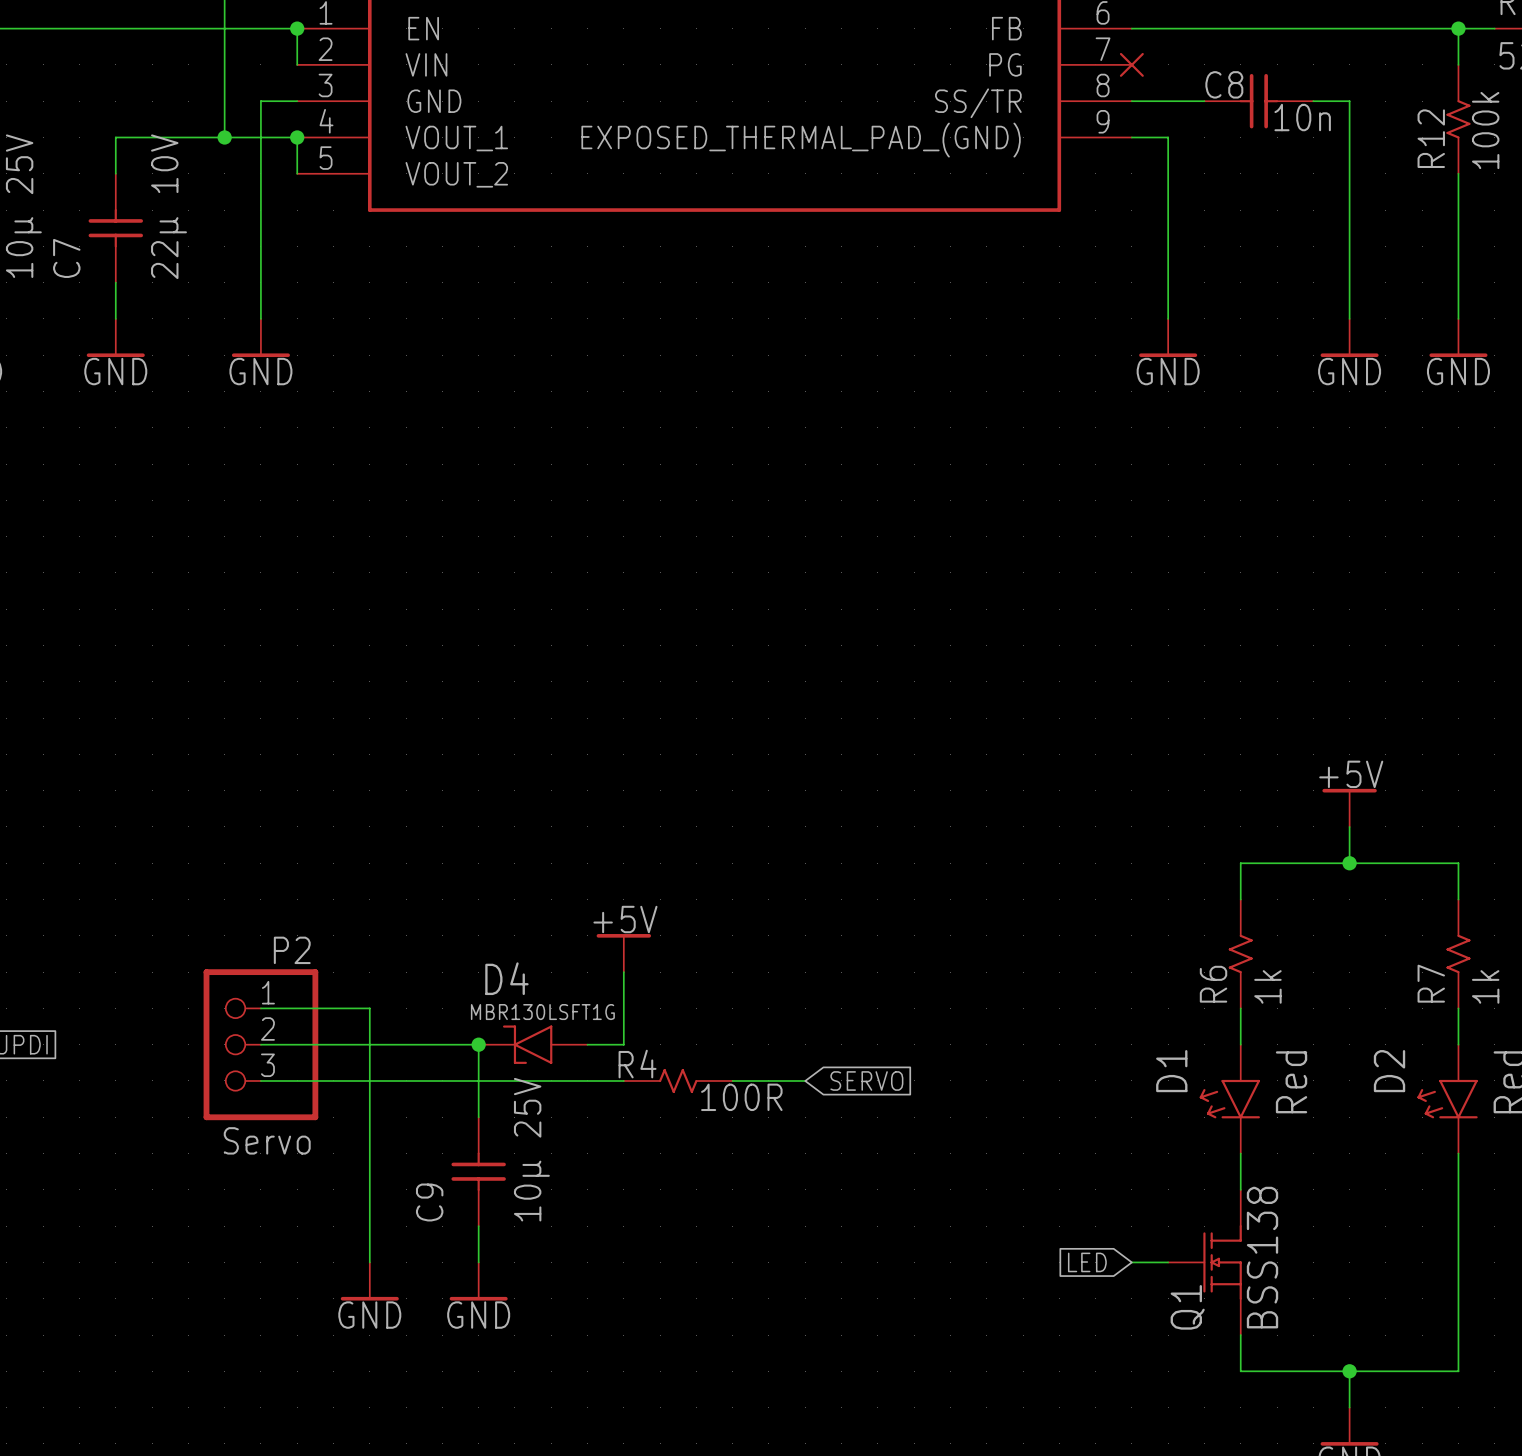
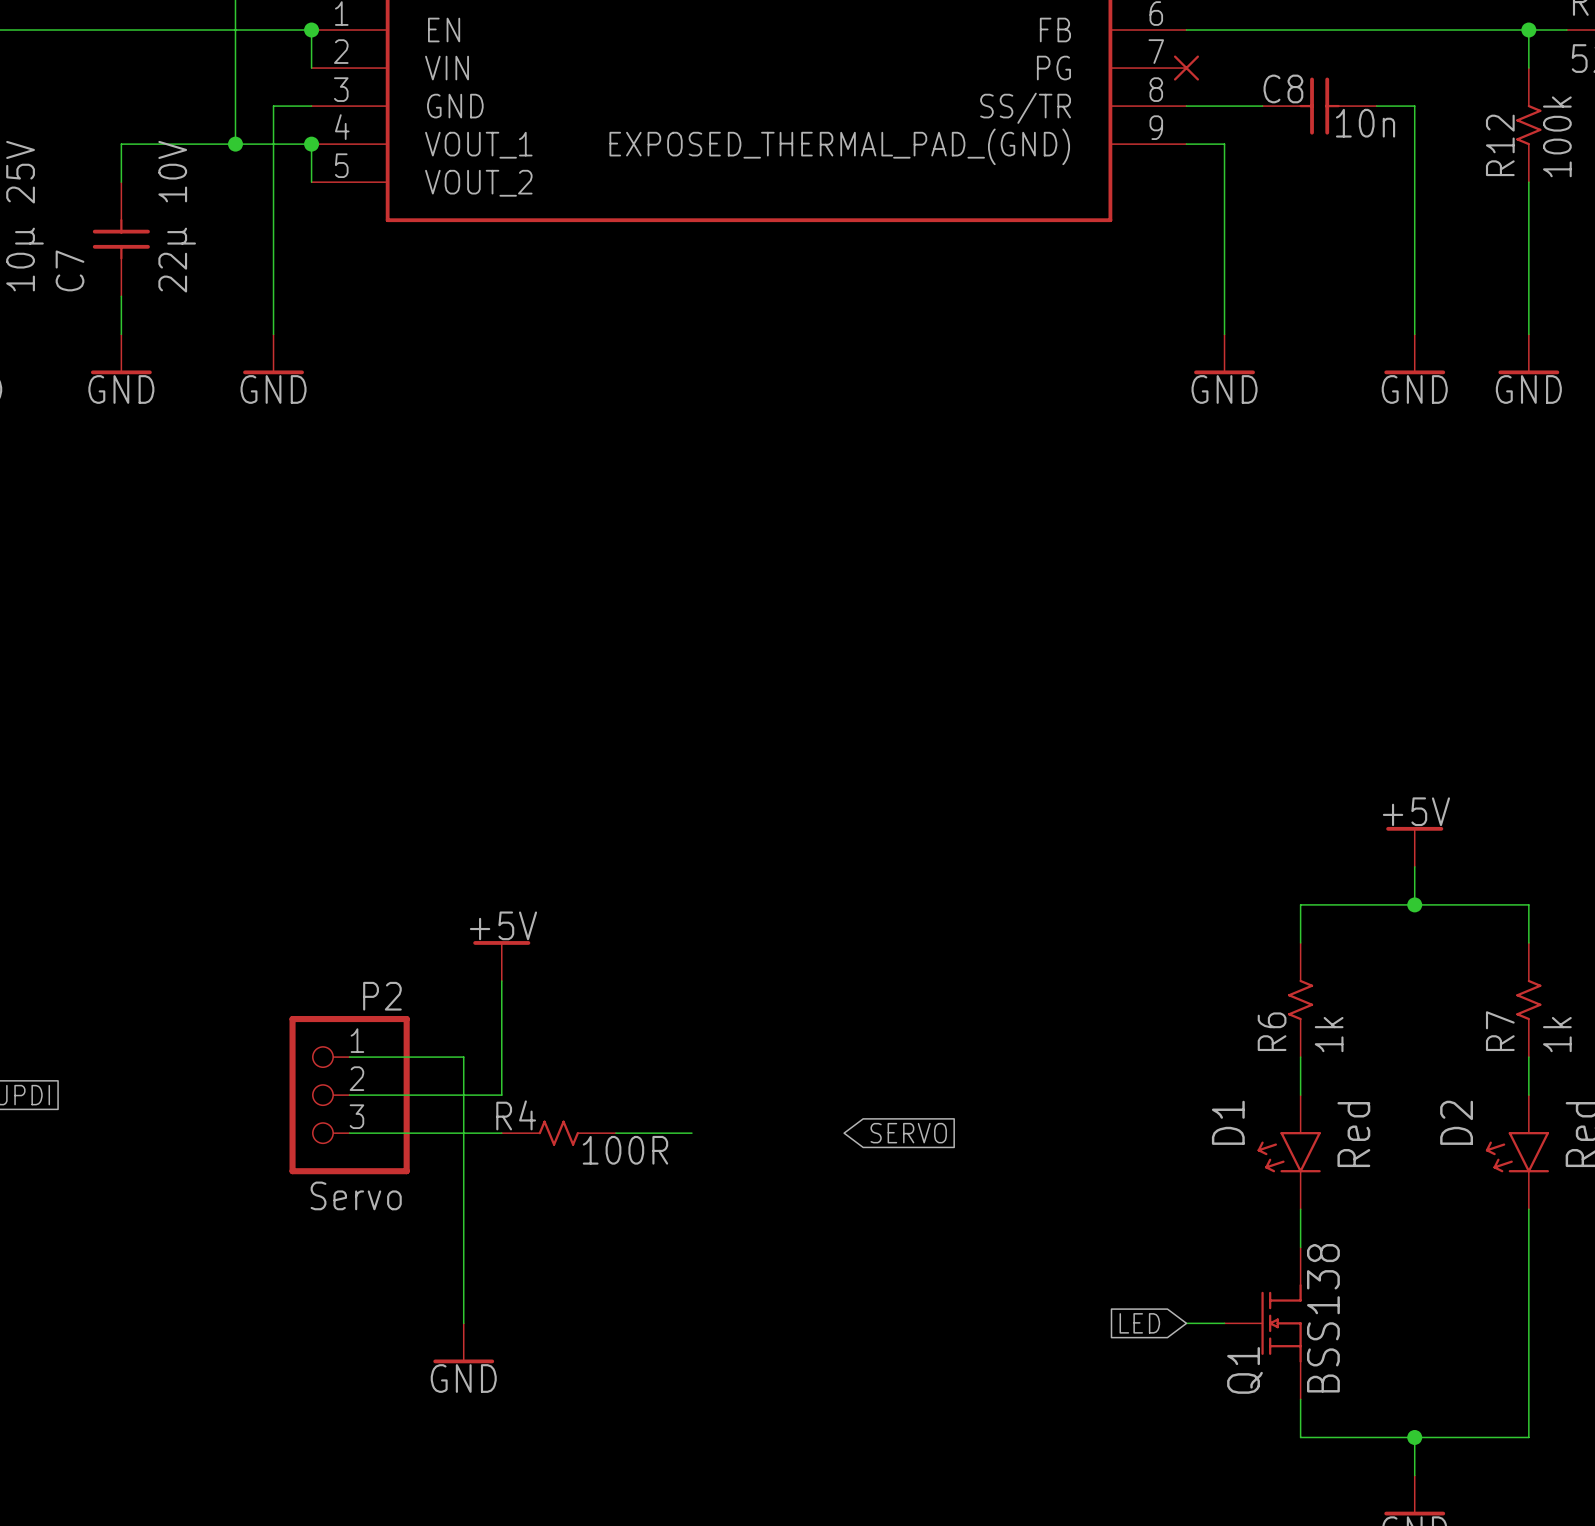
power symbol position: (623, 953) -> (501, 961)
wire: (623, 972) (623, 1044) (587, 1044) -> none
wire: (260, 1008) (333, 1008) -> none
wire: (369, 1008) (369, 1262) -> (387, 1057) (463, 1057) (463, 1323)
wire: (260, 1044) (333, 1044) -> none
P2 position: (260, 1044) -> (349, 1095)
wire: (478, 1044) (478, 1117) -> (501, 1095) (501, 981)
junction: (478, 1044) -> none
D4: MBR130LSFT1G (533, 1044) -> none
wire: (260, 1080) (333, 1080) -> none
R4 position: (678, 1080) -> (558, 1133)
wire: (732, 1080) (805, 1080) -> none
C9: 10µ 25V (478, 1171) -> none
wire: (478, 1226) (478, 1262) -> none
power symbol: GND (369, 1281) -> none
power symbol: none -> GND (463, 1343)
power symbol: GND (478, 1281) -> none

